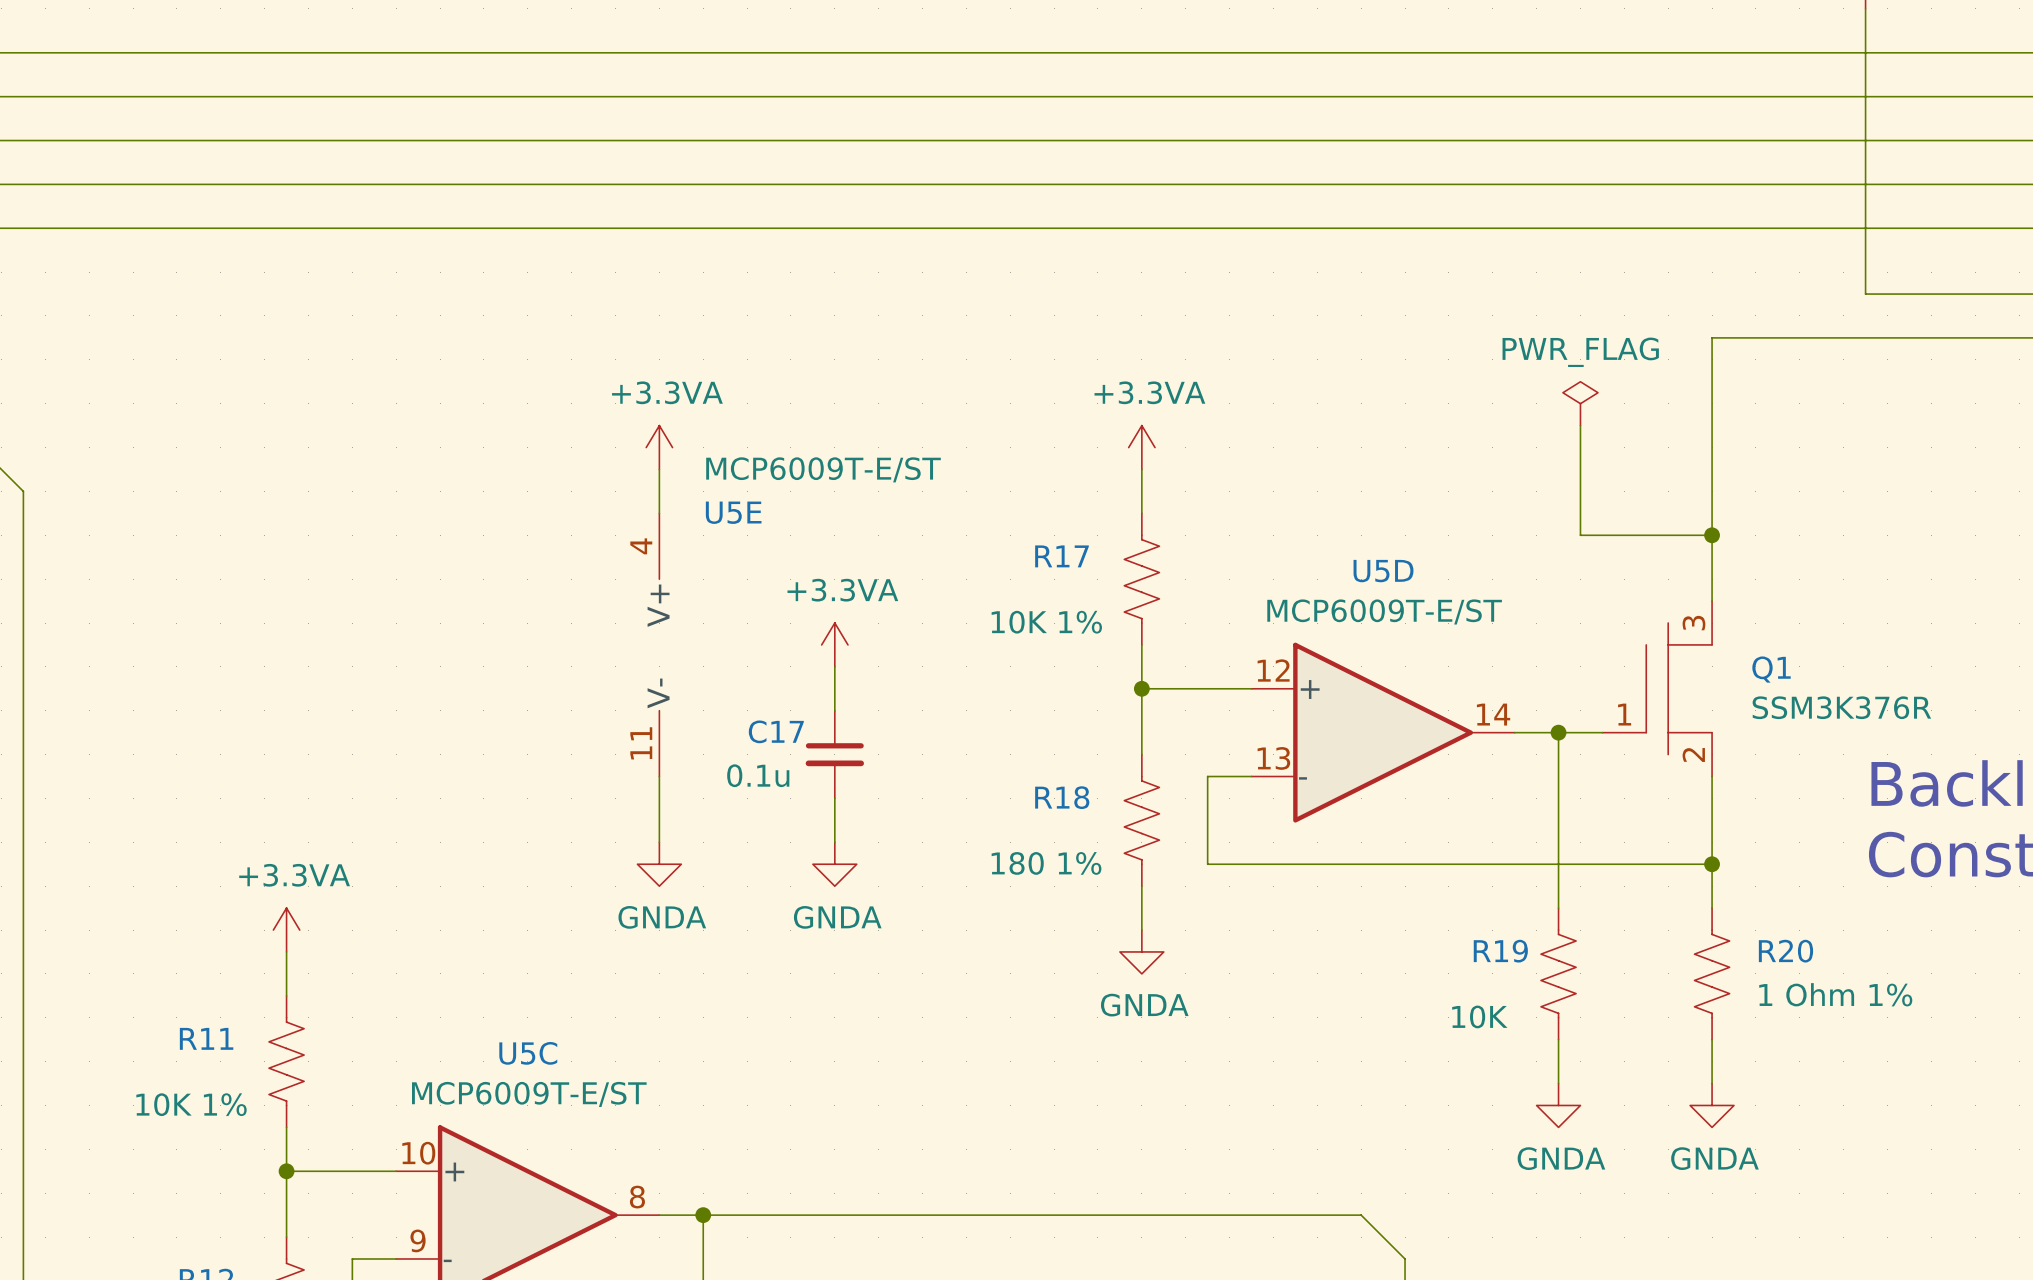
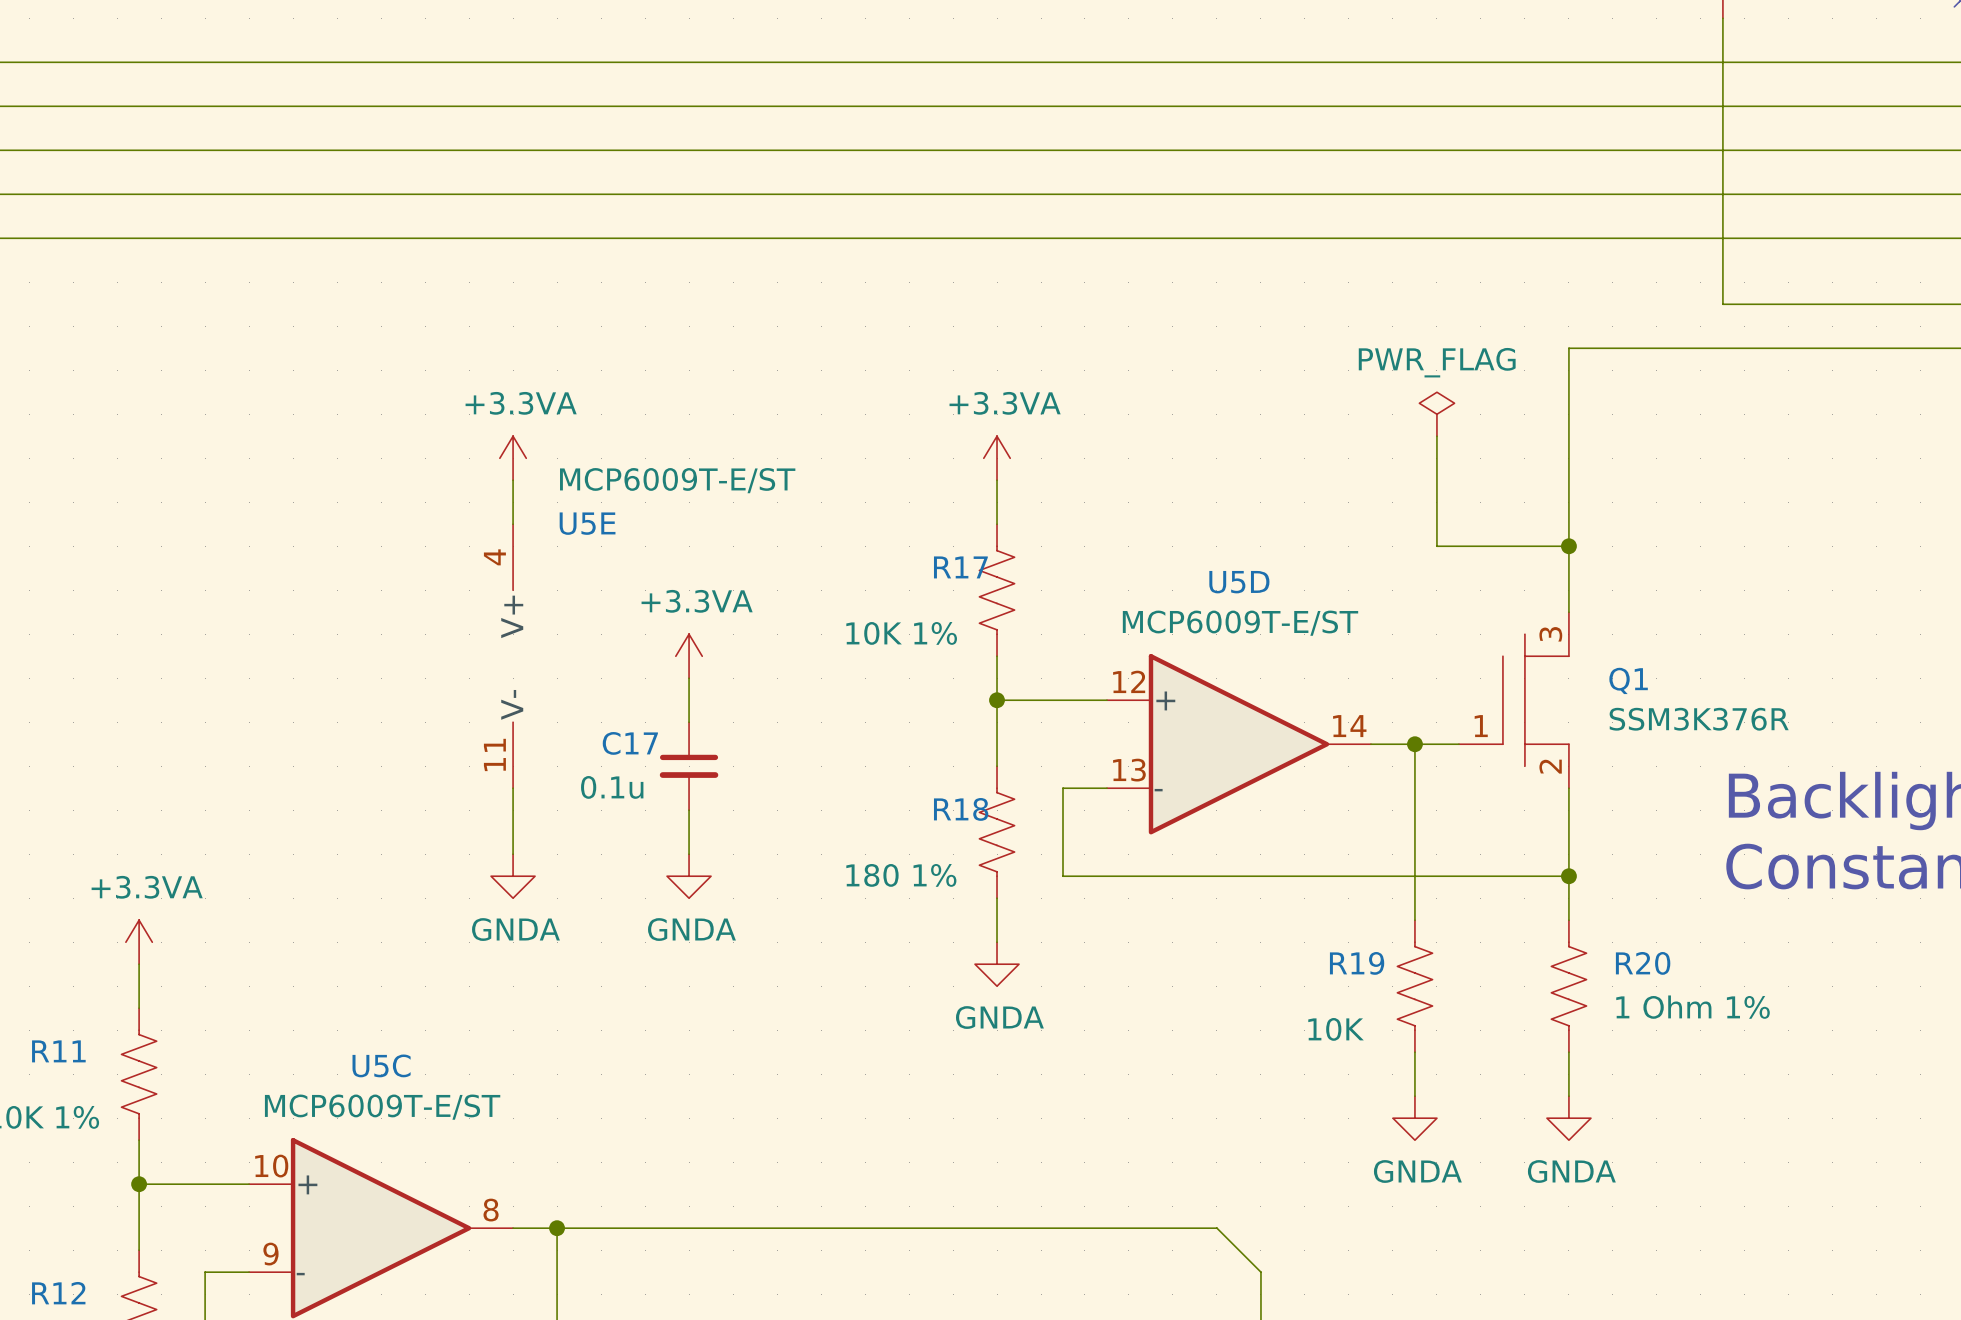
R17 name position: R17 (1061, 556) -> R17 (960, 567)
R18 name position: R18 (1062, 797) -> R18 (961, 809)

